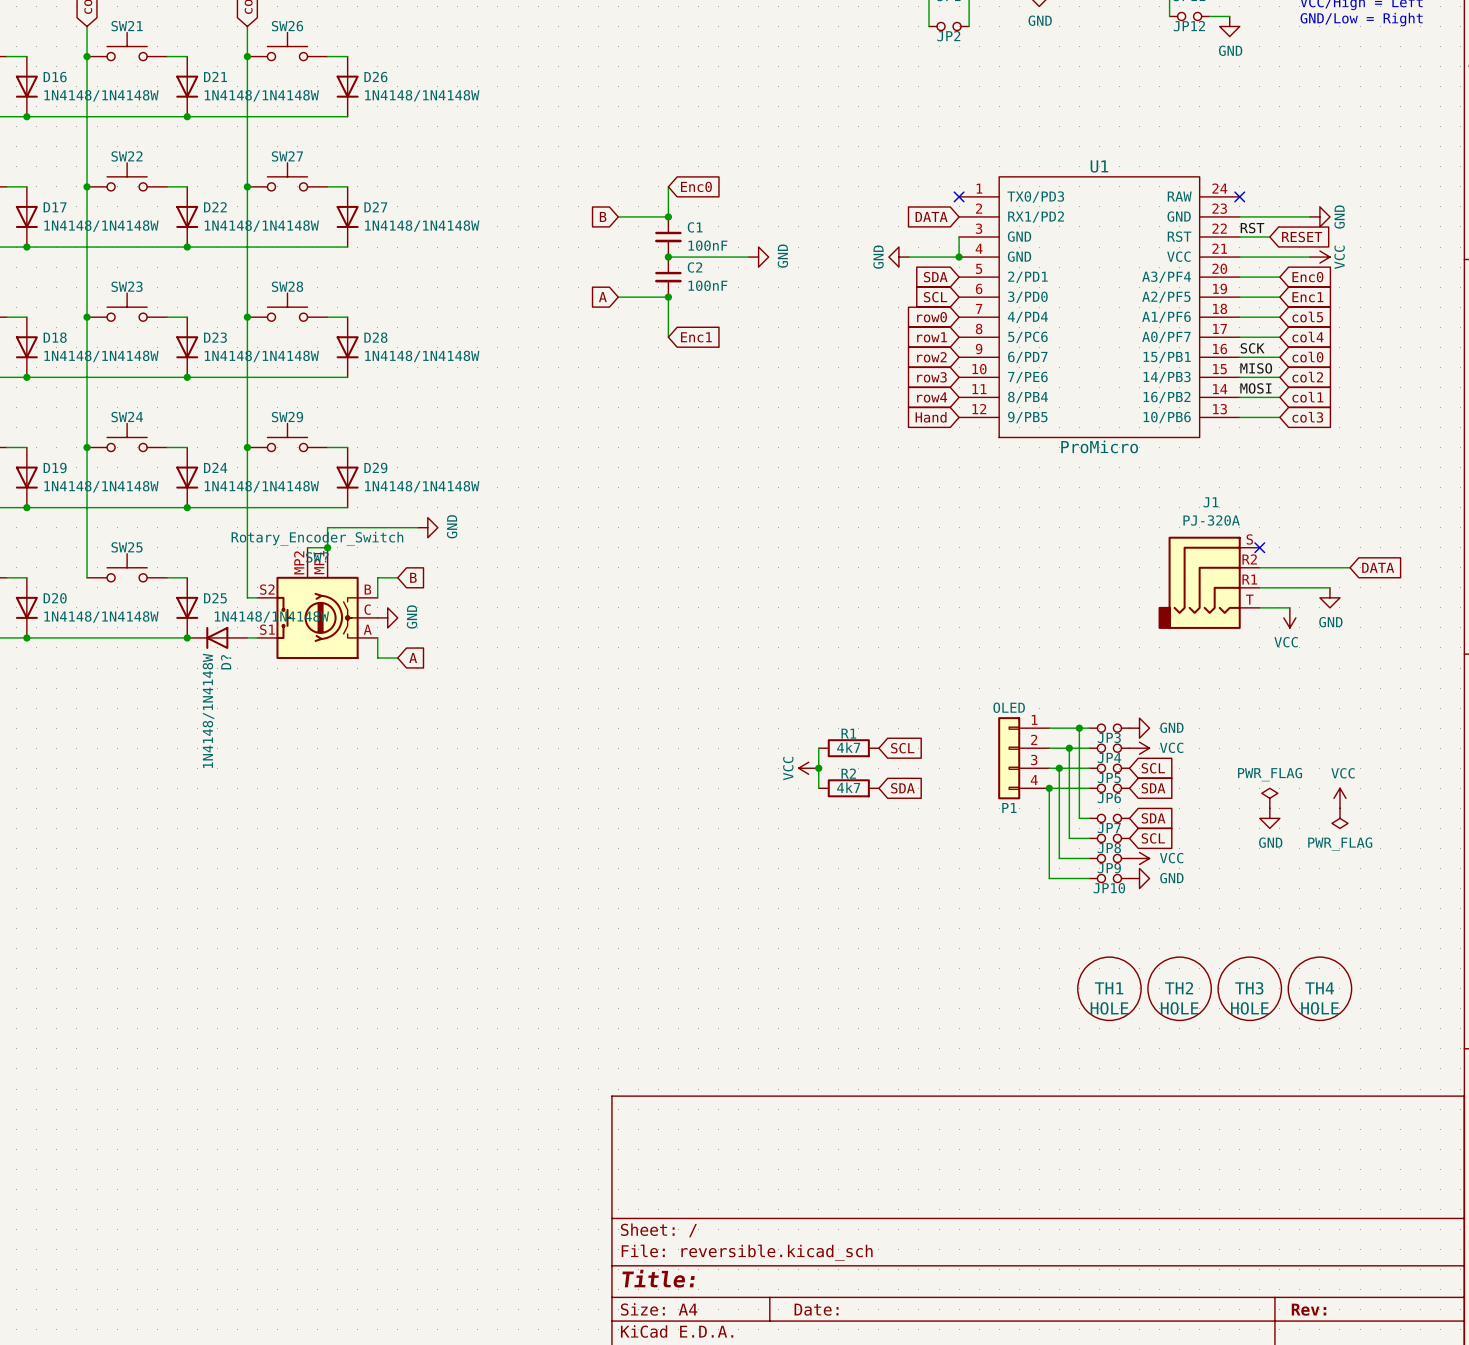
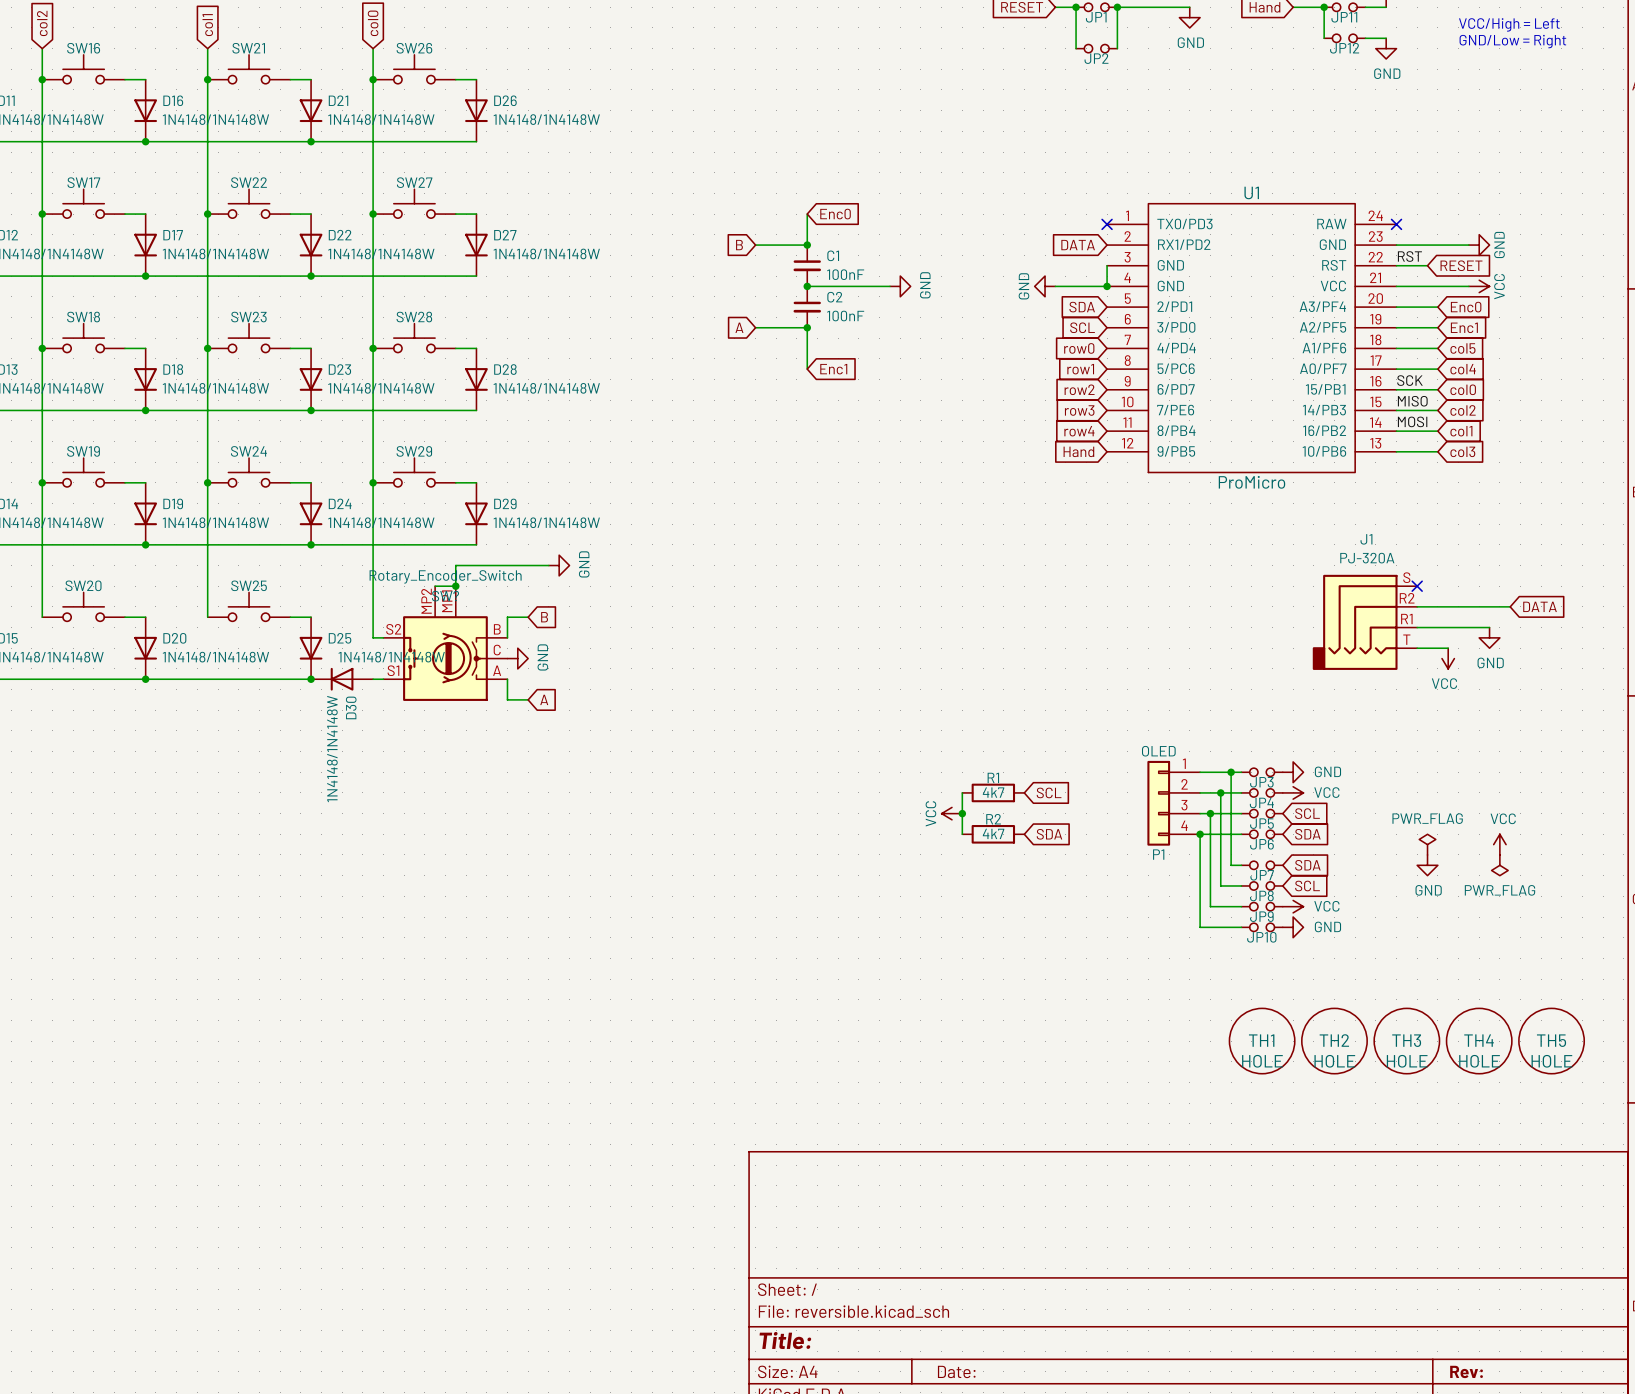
D? name: D? (226, 662) -> D30 (351, 707)
TH5: none -> HOLE (1551, 1041)

